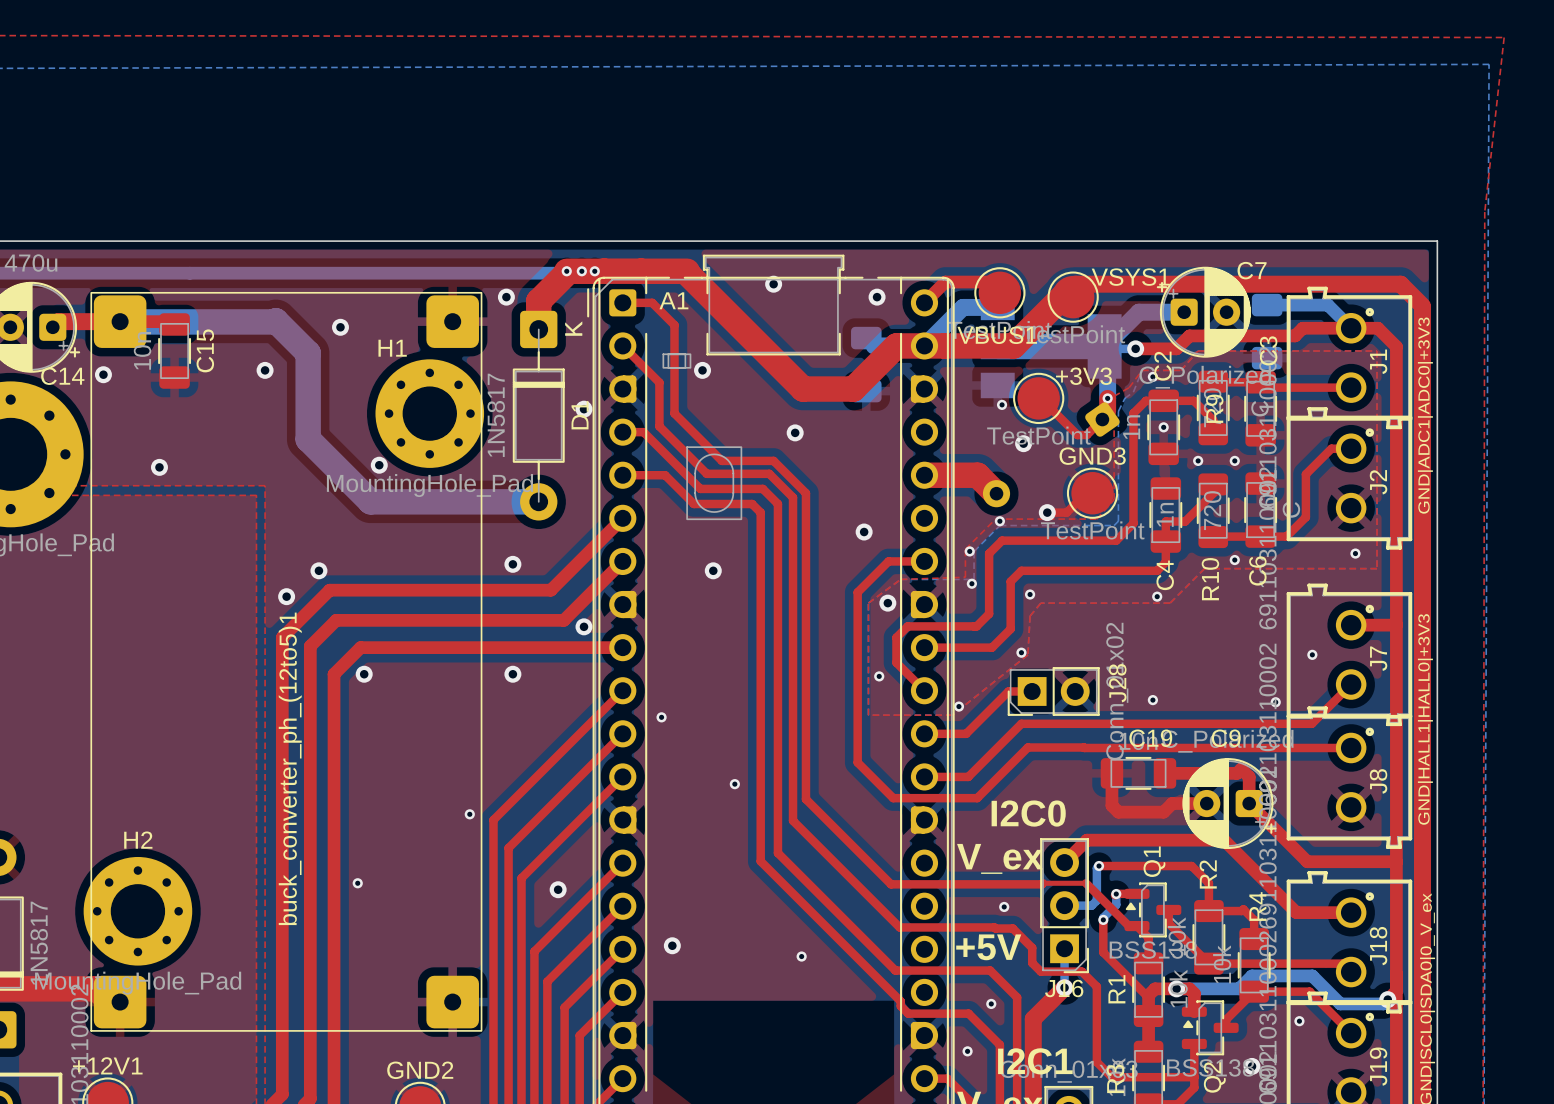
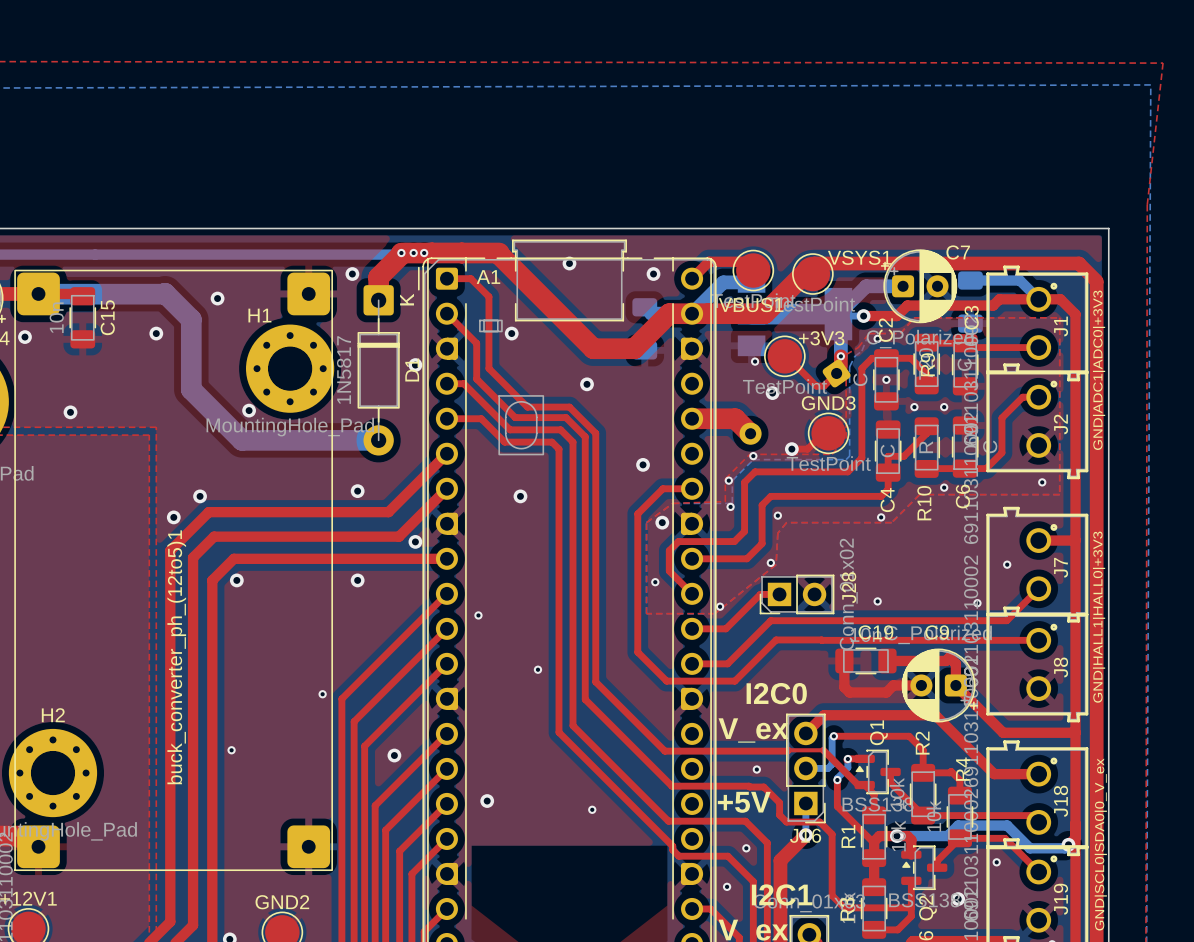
C2 value: 1n (1131, 427) -> C (860, 379)
R10 value: 720 (1212, 510) -> R (926, 447)
C4 value: 1n (1165, 514) -> C (887, 450)

